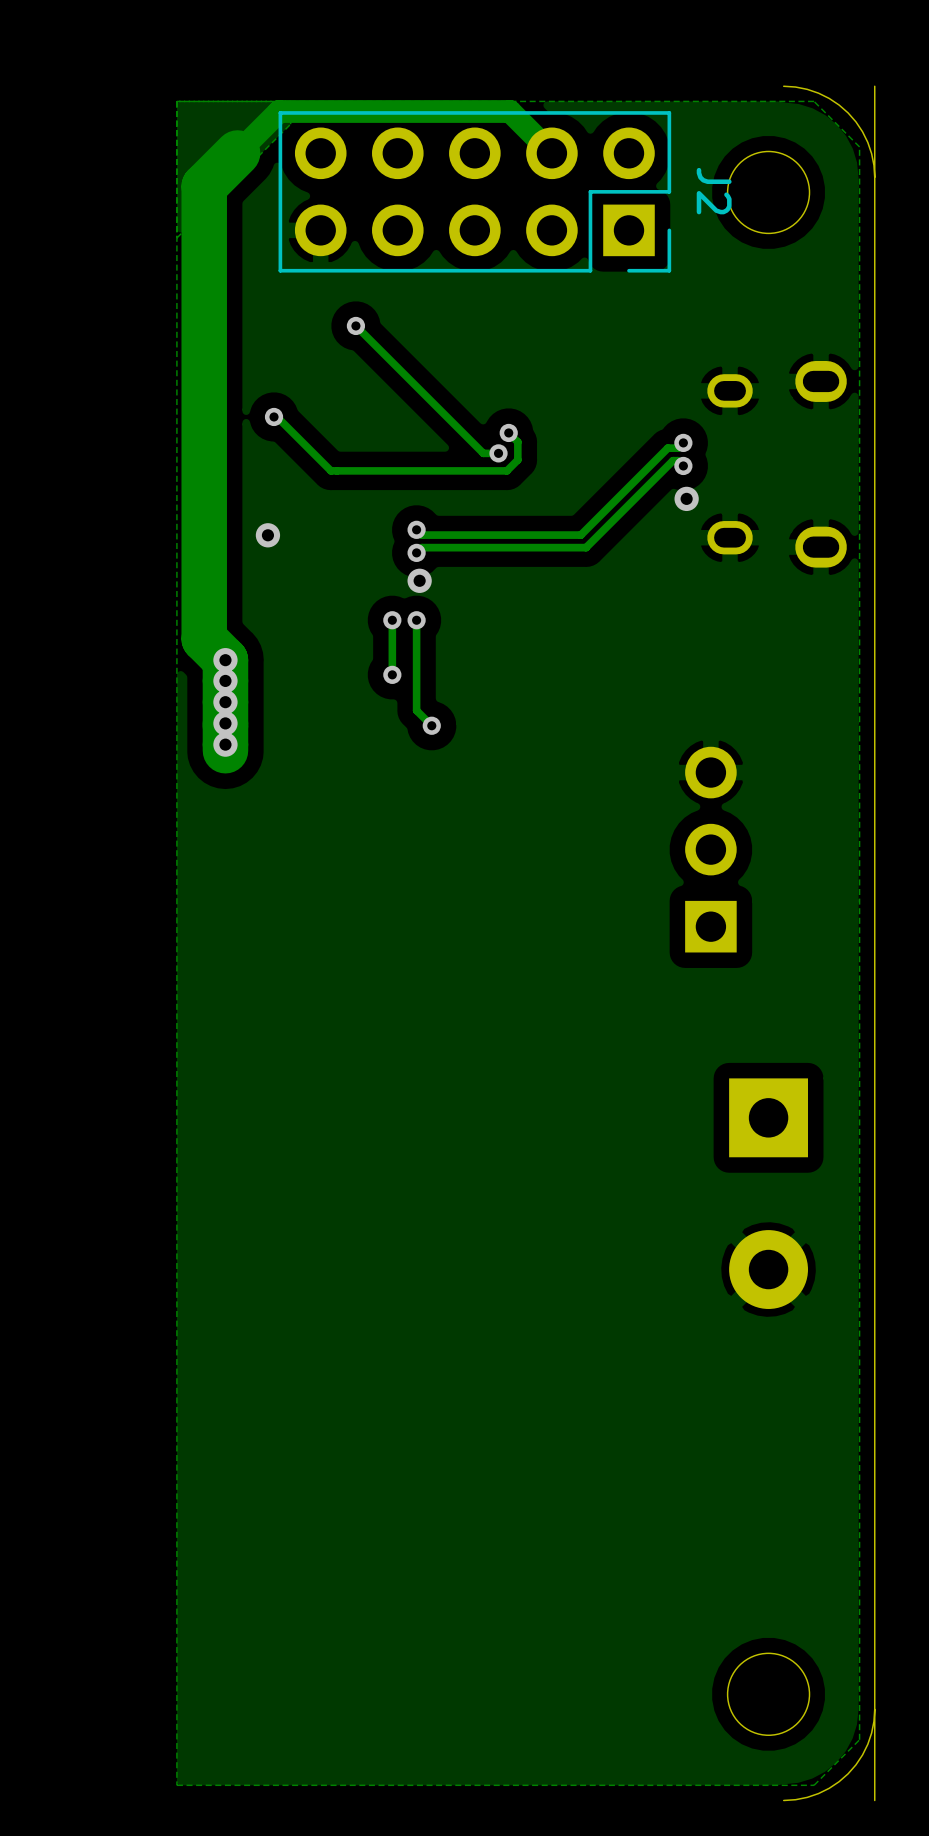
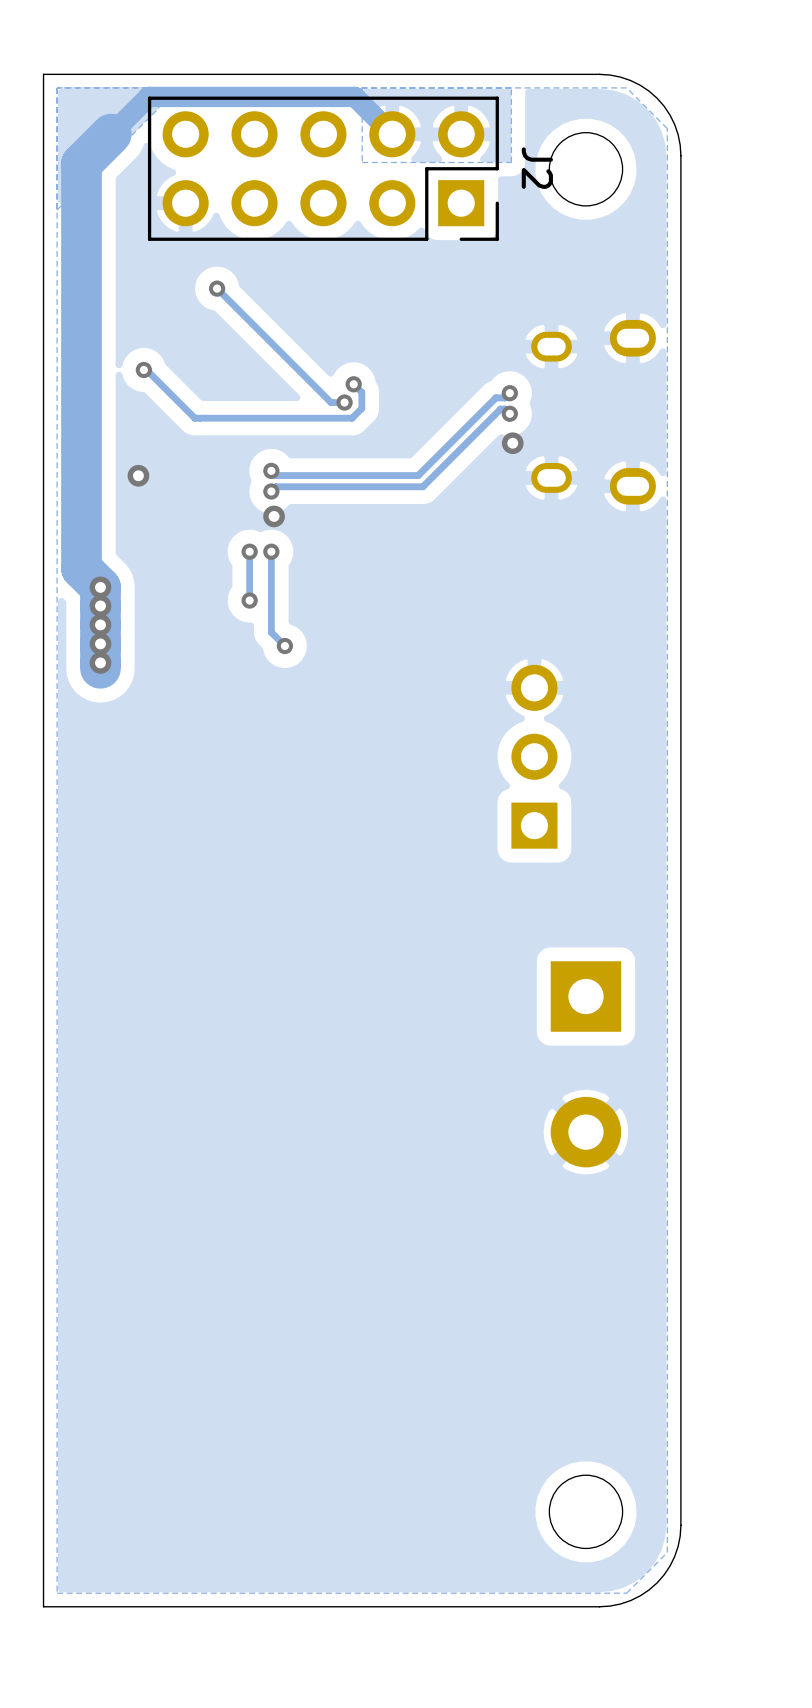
board edge: none -> (599, 74) (43, 74) (43, 1606) (599, 1606)
board edge: (874, 86) (874, 177) -> none
zone outline: none -> (511, 87) (511, 162) (362, 162) (362, 87)
board edge: (874, 1709) (874, 1800) -> none

